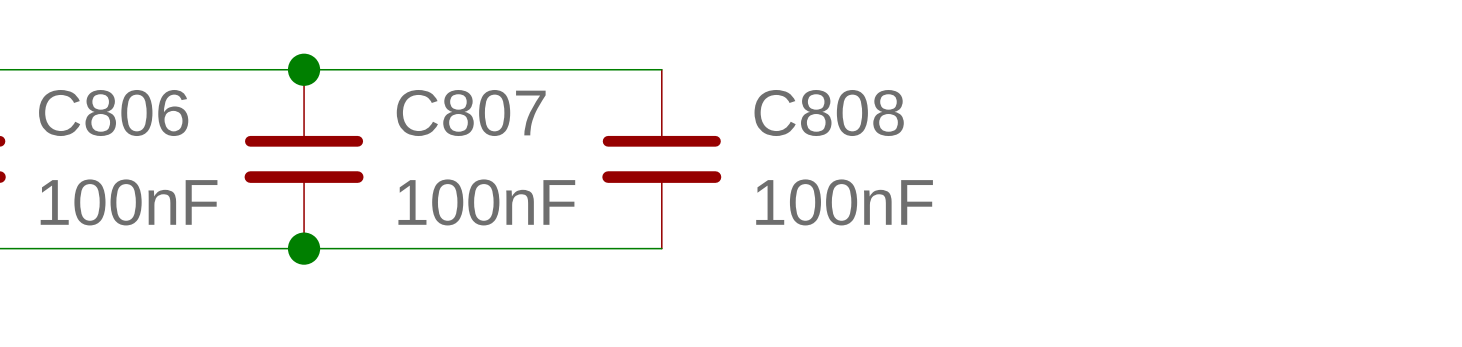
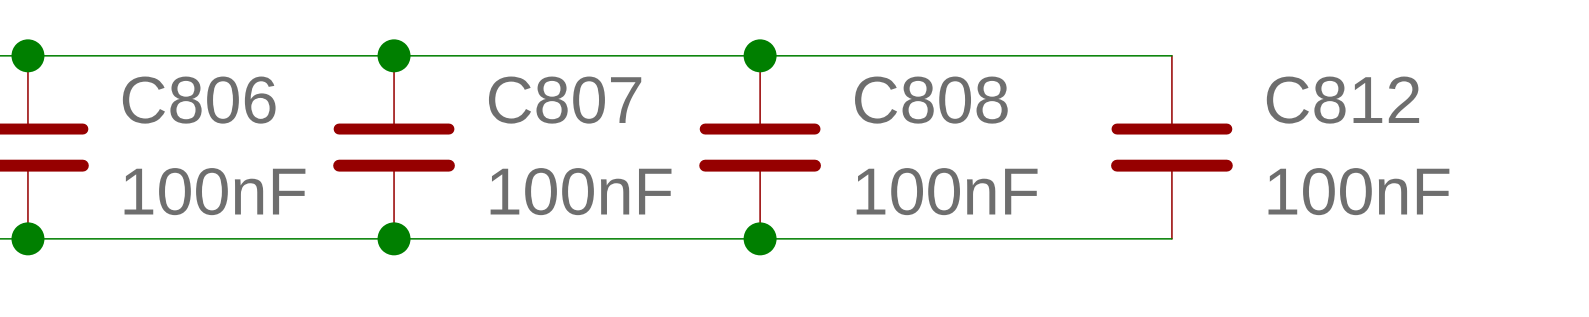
wire: none -> (760, 55) (1171, 55)
junction: none -> (760, 55)
C812: none -> 100nF (1171, 147)
wire: none -> (760, 238) (1171, 238)
junction: none -> (760, 238)

